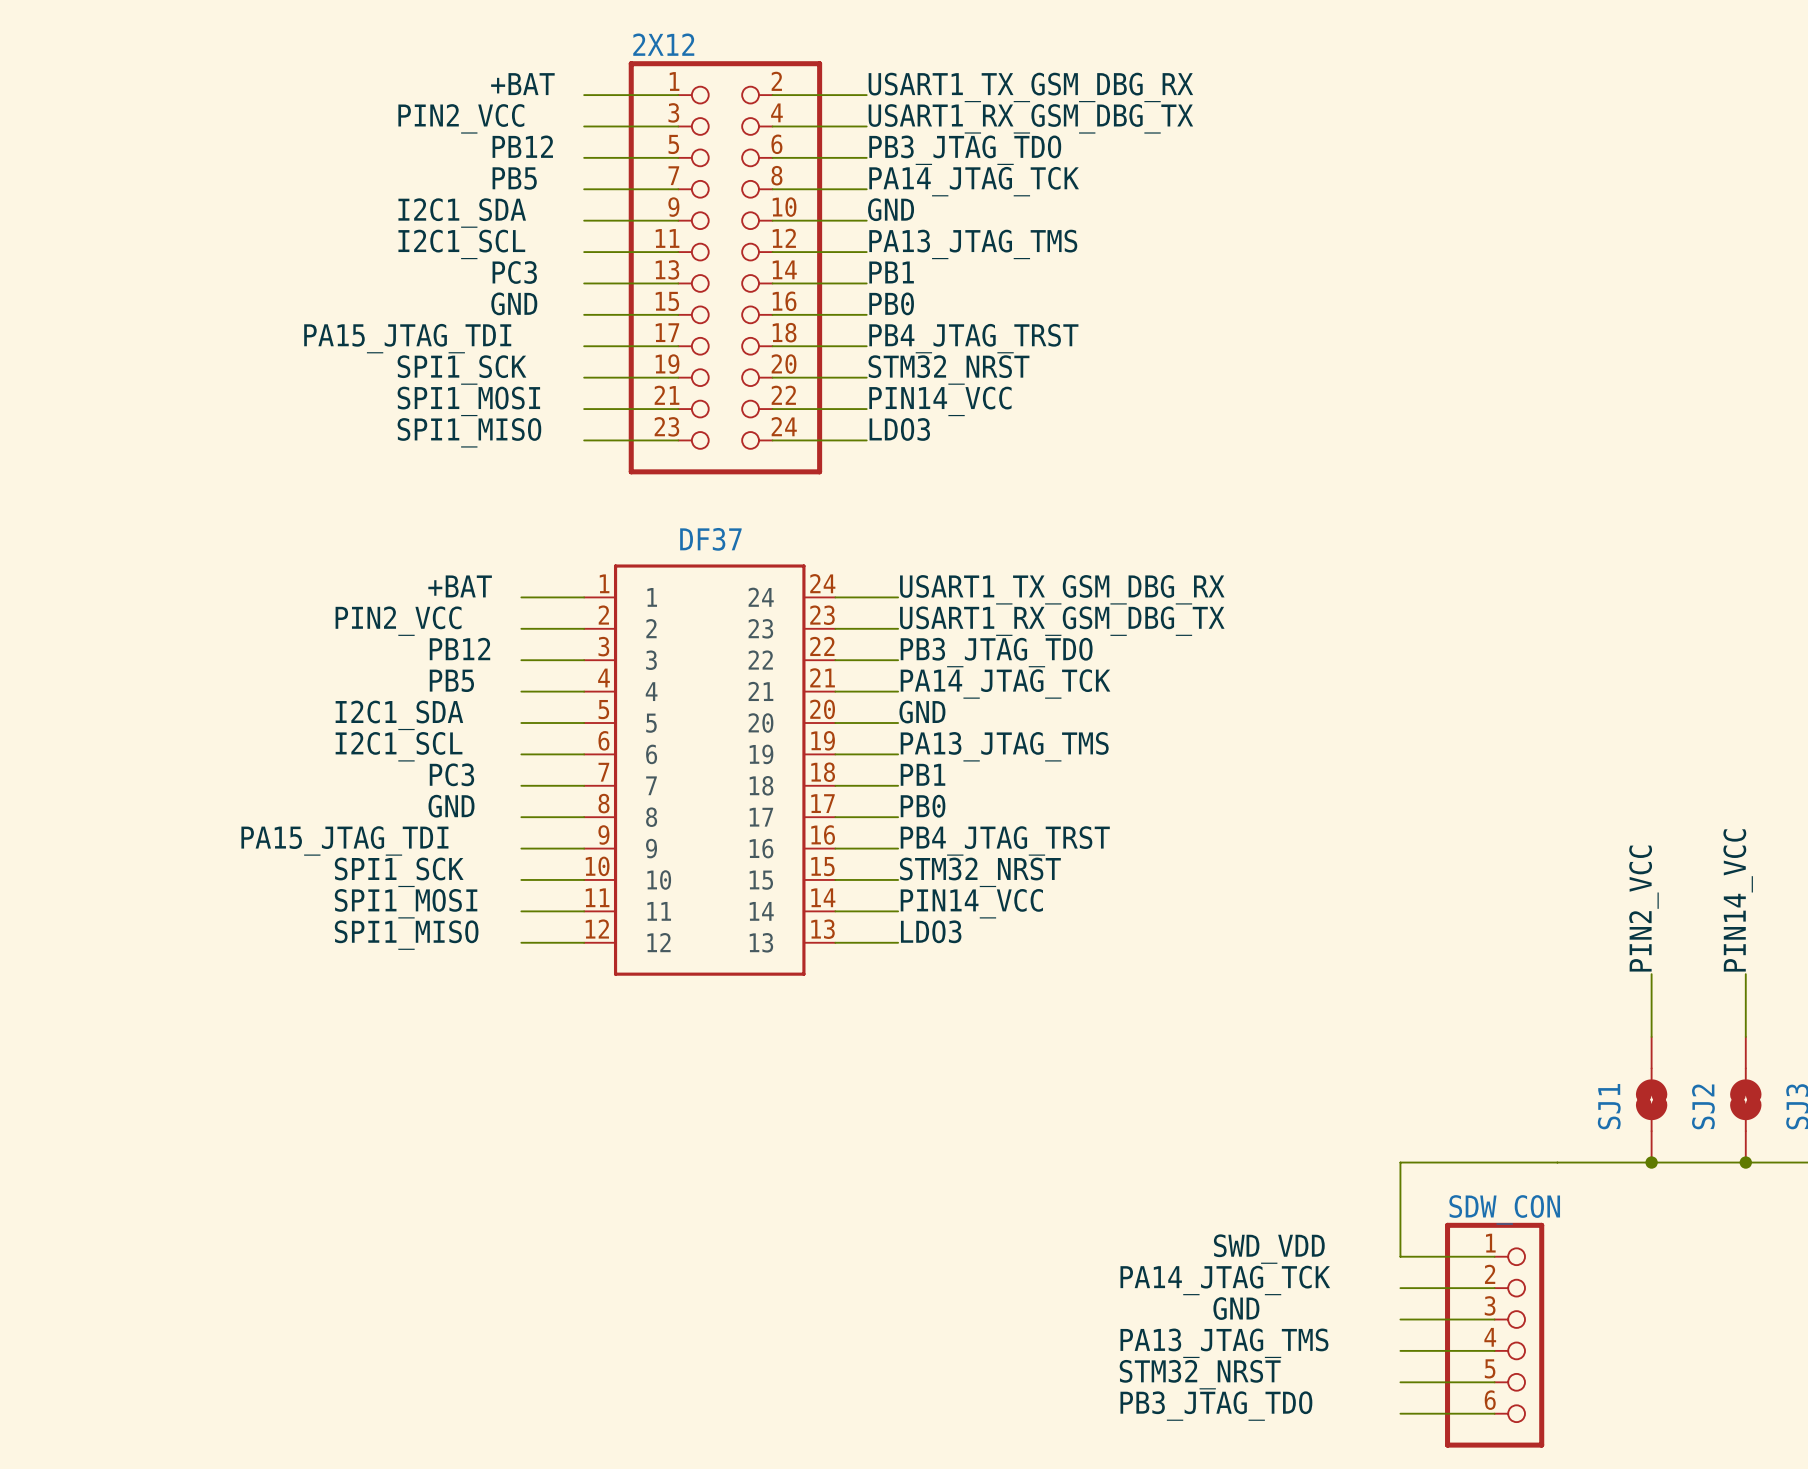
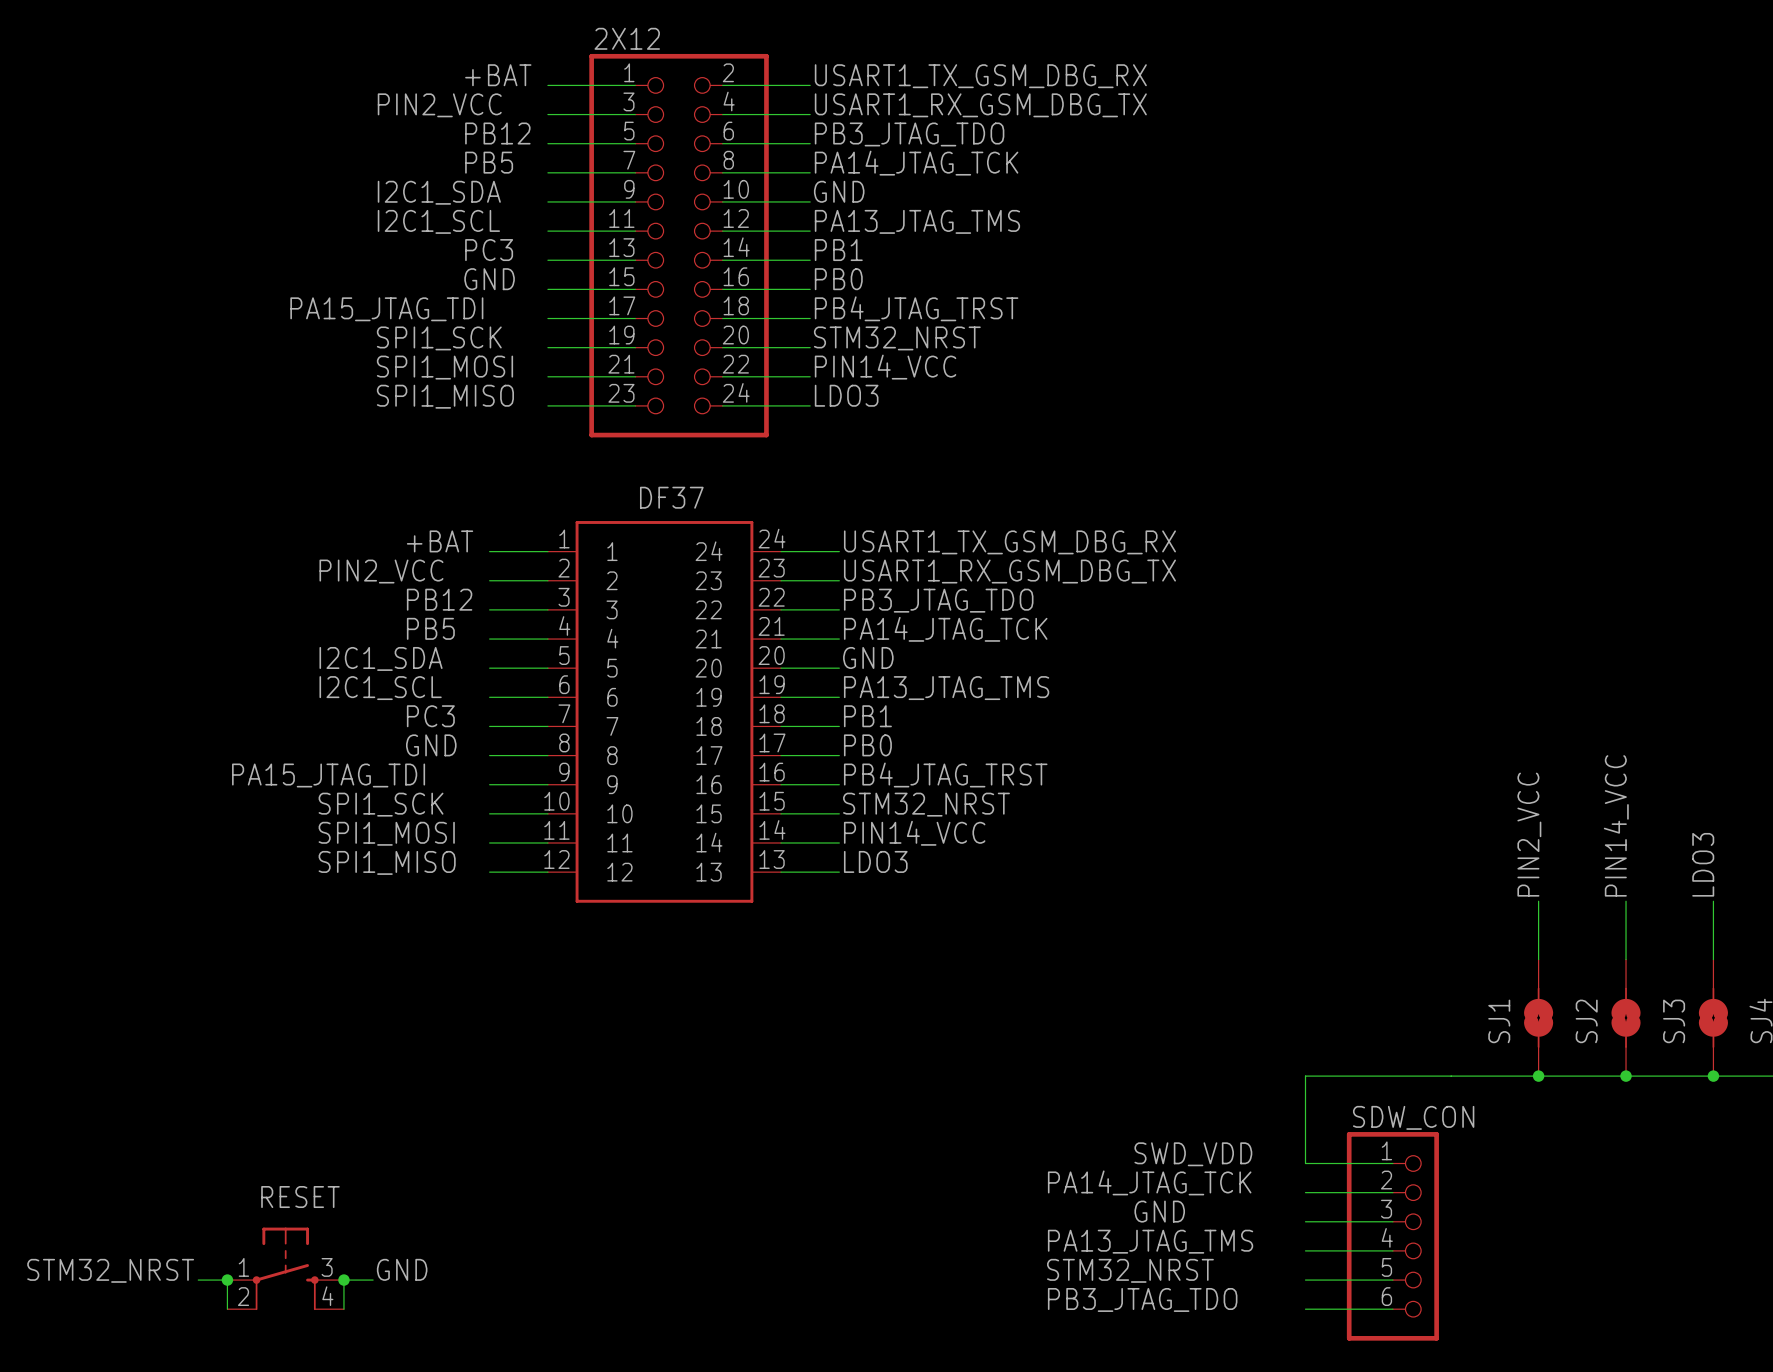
RESET: none -> (285, 1268)
label: none -> GND (402, 1269)
label: none -> STM32_NRST (110, 1270)
wire: none -> (198, 1280) (227, 1280) (227, 1309)
junction: none -> (227, 1280)
junction: none -> (343, 1280)
wire: none -> (373, 1280) (343, 1280) (343, 1309)

